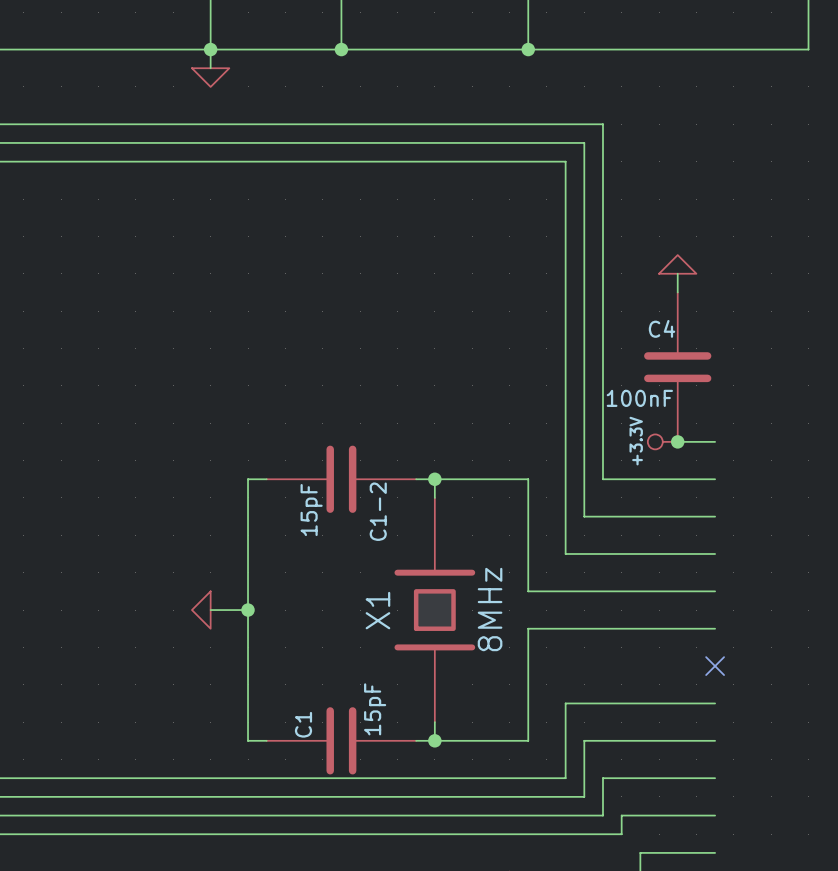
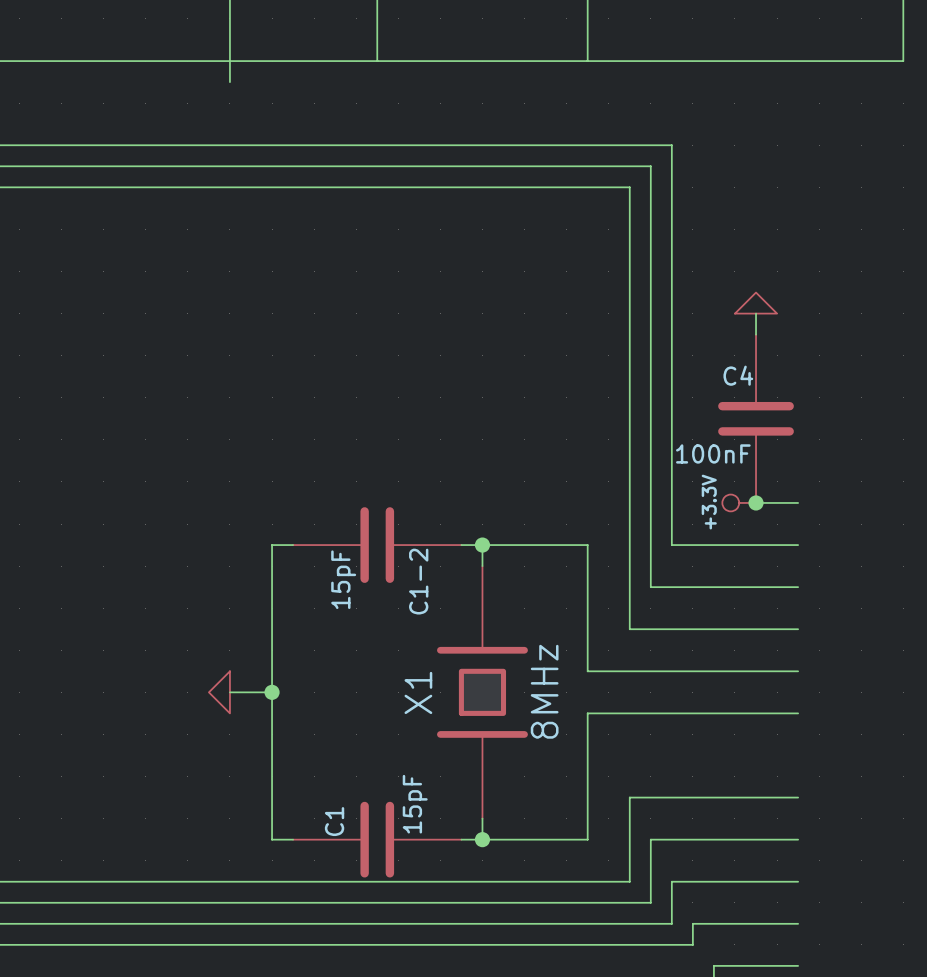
junction: (210, 49) -> none
junction: (341, 49) -> none
junction: (528, 49) -> none
power symbol: (210, 77) -> none
no-connect mark: (715, 666) -> none

